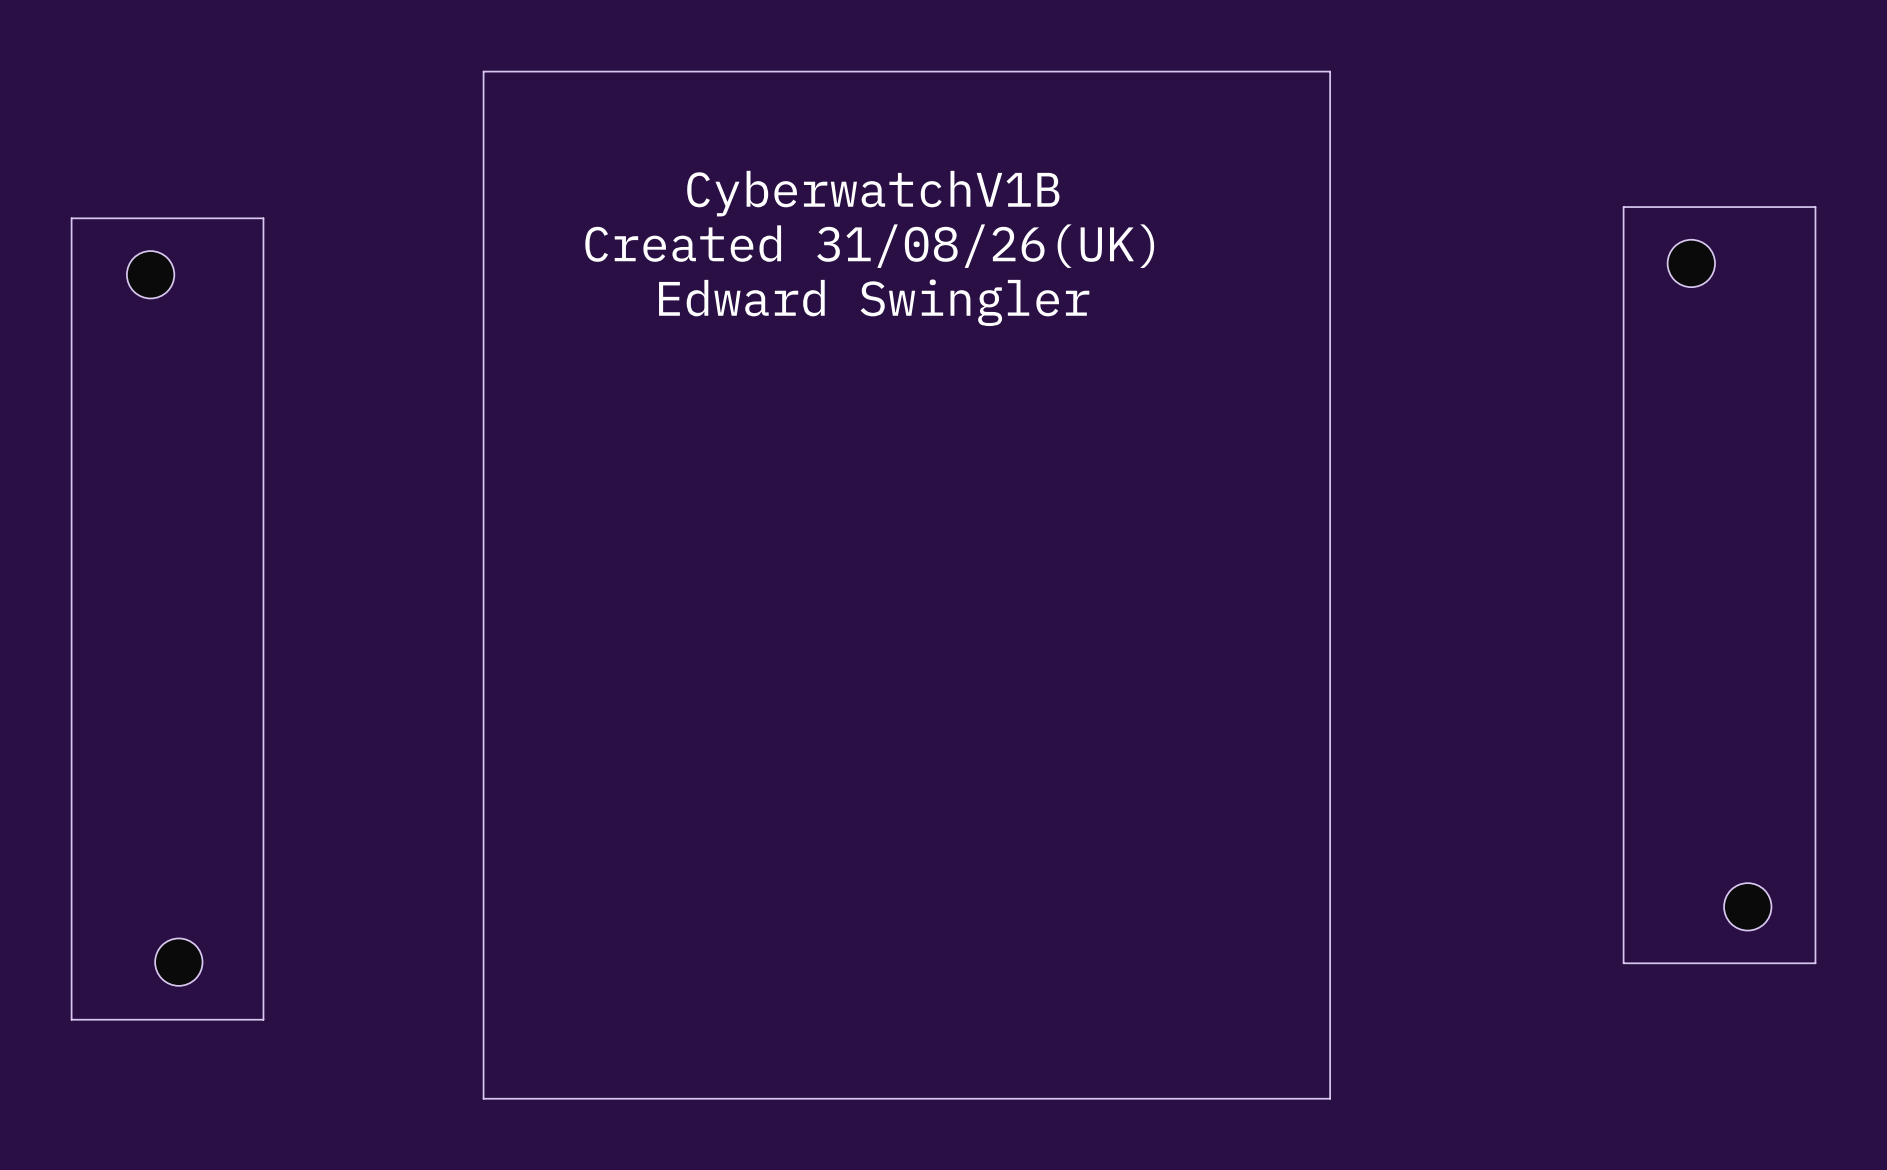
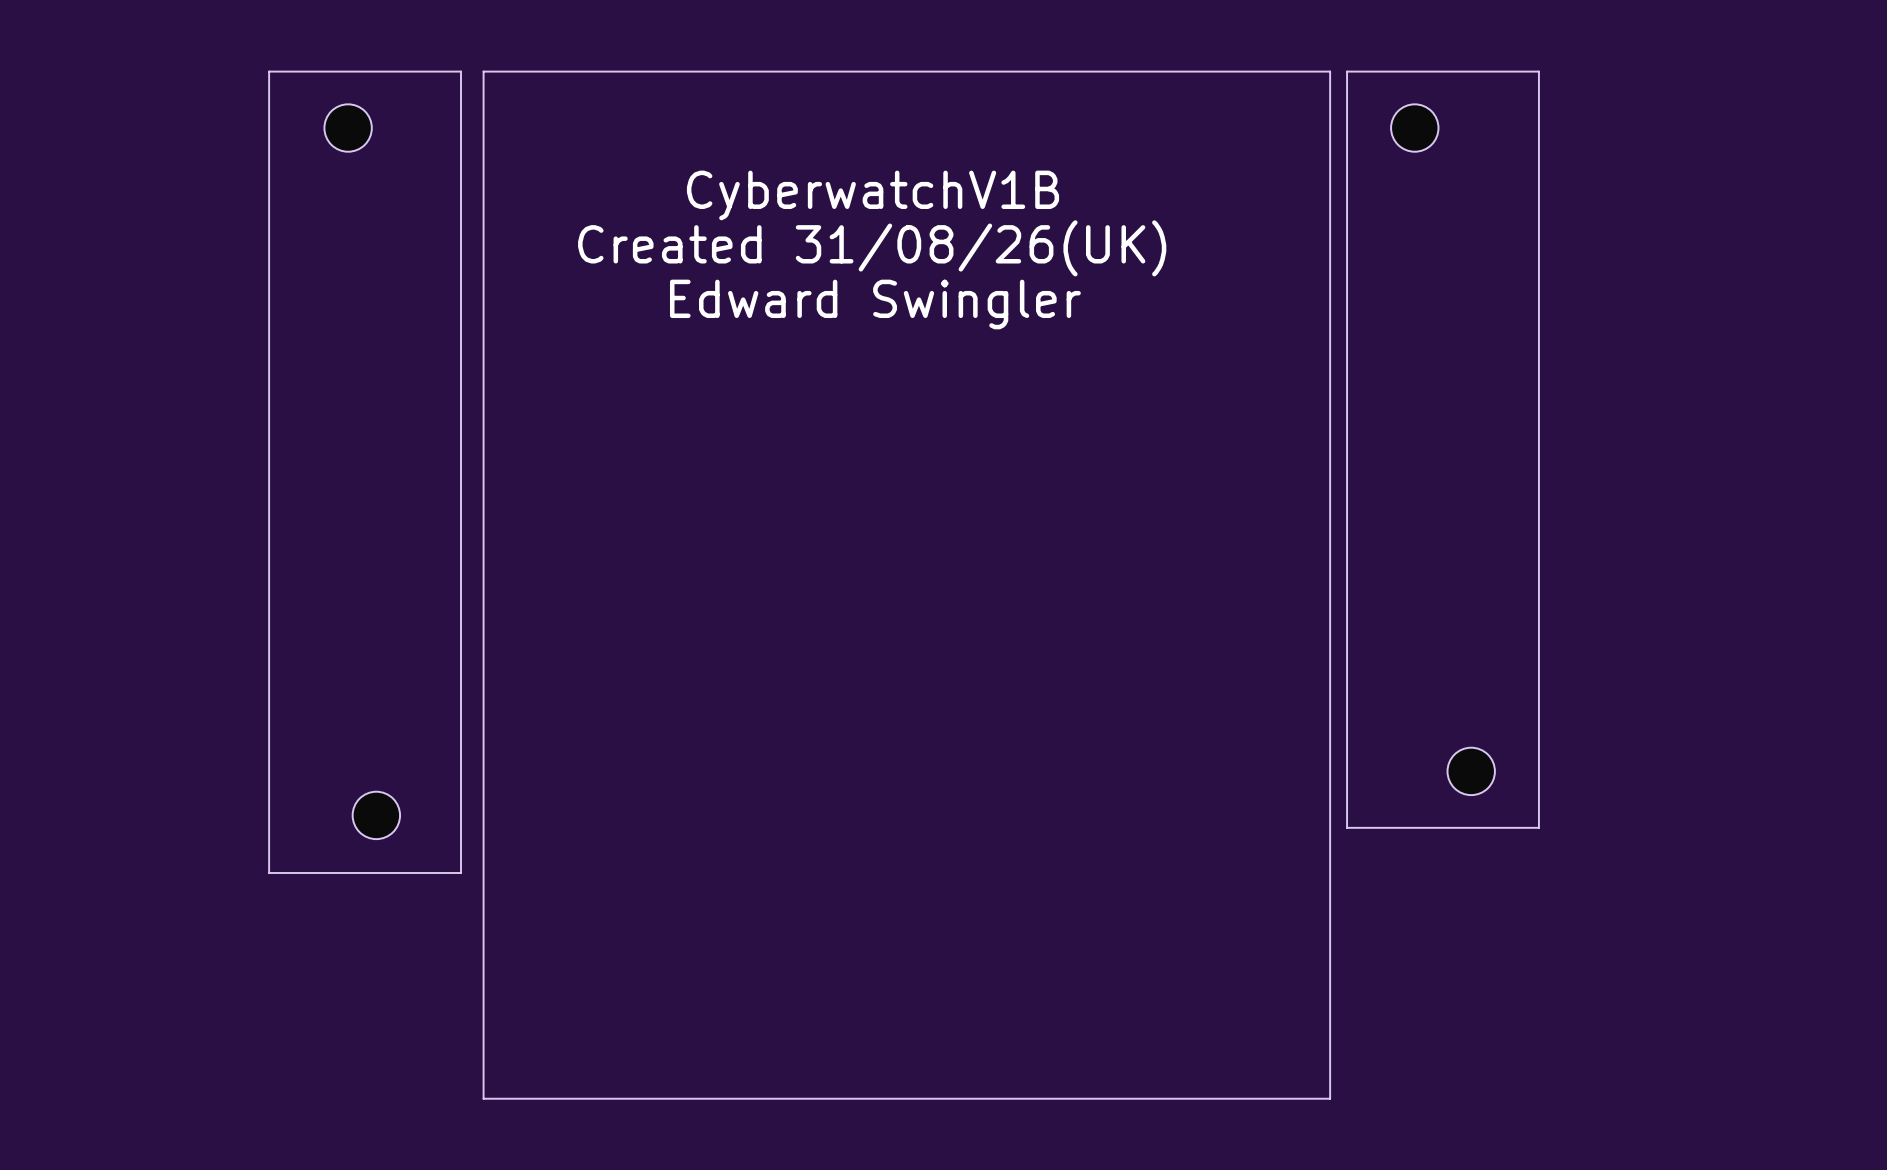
part: none -> (1414, 128)
board edge: (1815, 207) (1623, 207) (1623, 963) (1815, 963) (1815, 207) -> (1538, 71) (1347, 71) (1347, 827) (1538, 827) (1538, 71)
board edge: (263, 218) (71, 218) (71, 1019) (263, 1019) (263, 218) -> (461, 71) (269, 71) (269, 872) (461, 872) (461, 71)
part: (1691, 263) -> none
part position: (150, 274) -> (348, 128)
part: none -> (1471, 771)
part: (1747, 906) -> none
part position: (178, 962) -> (376, 815)

